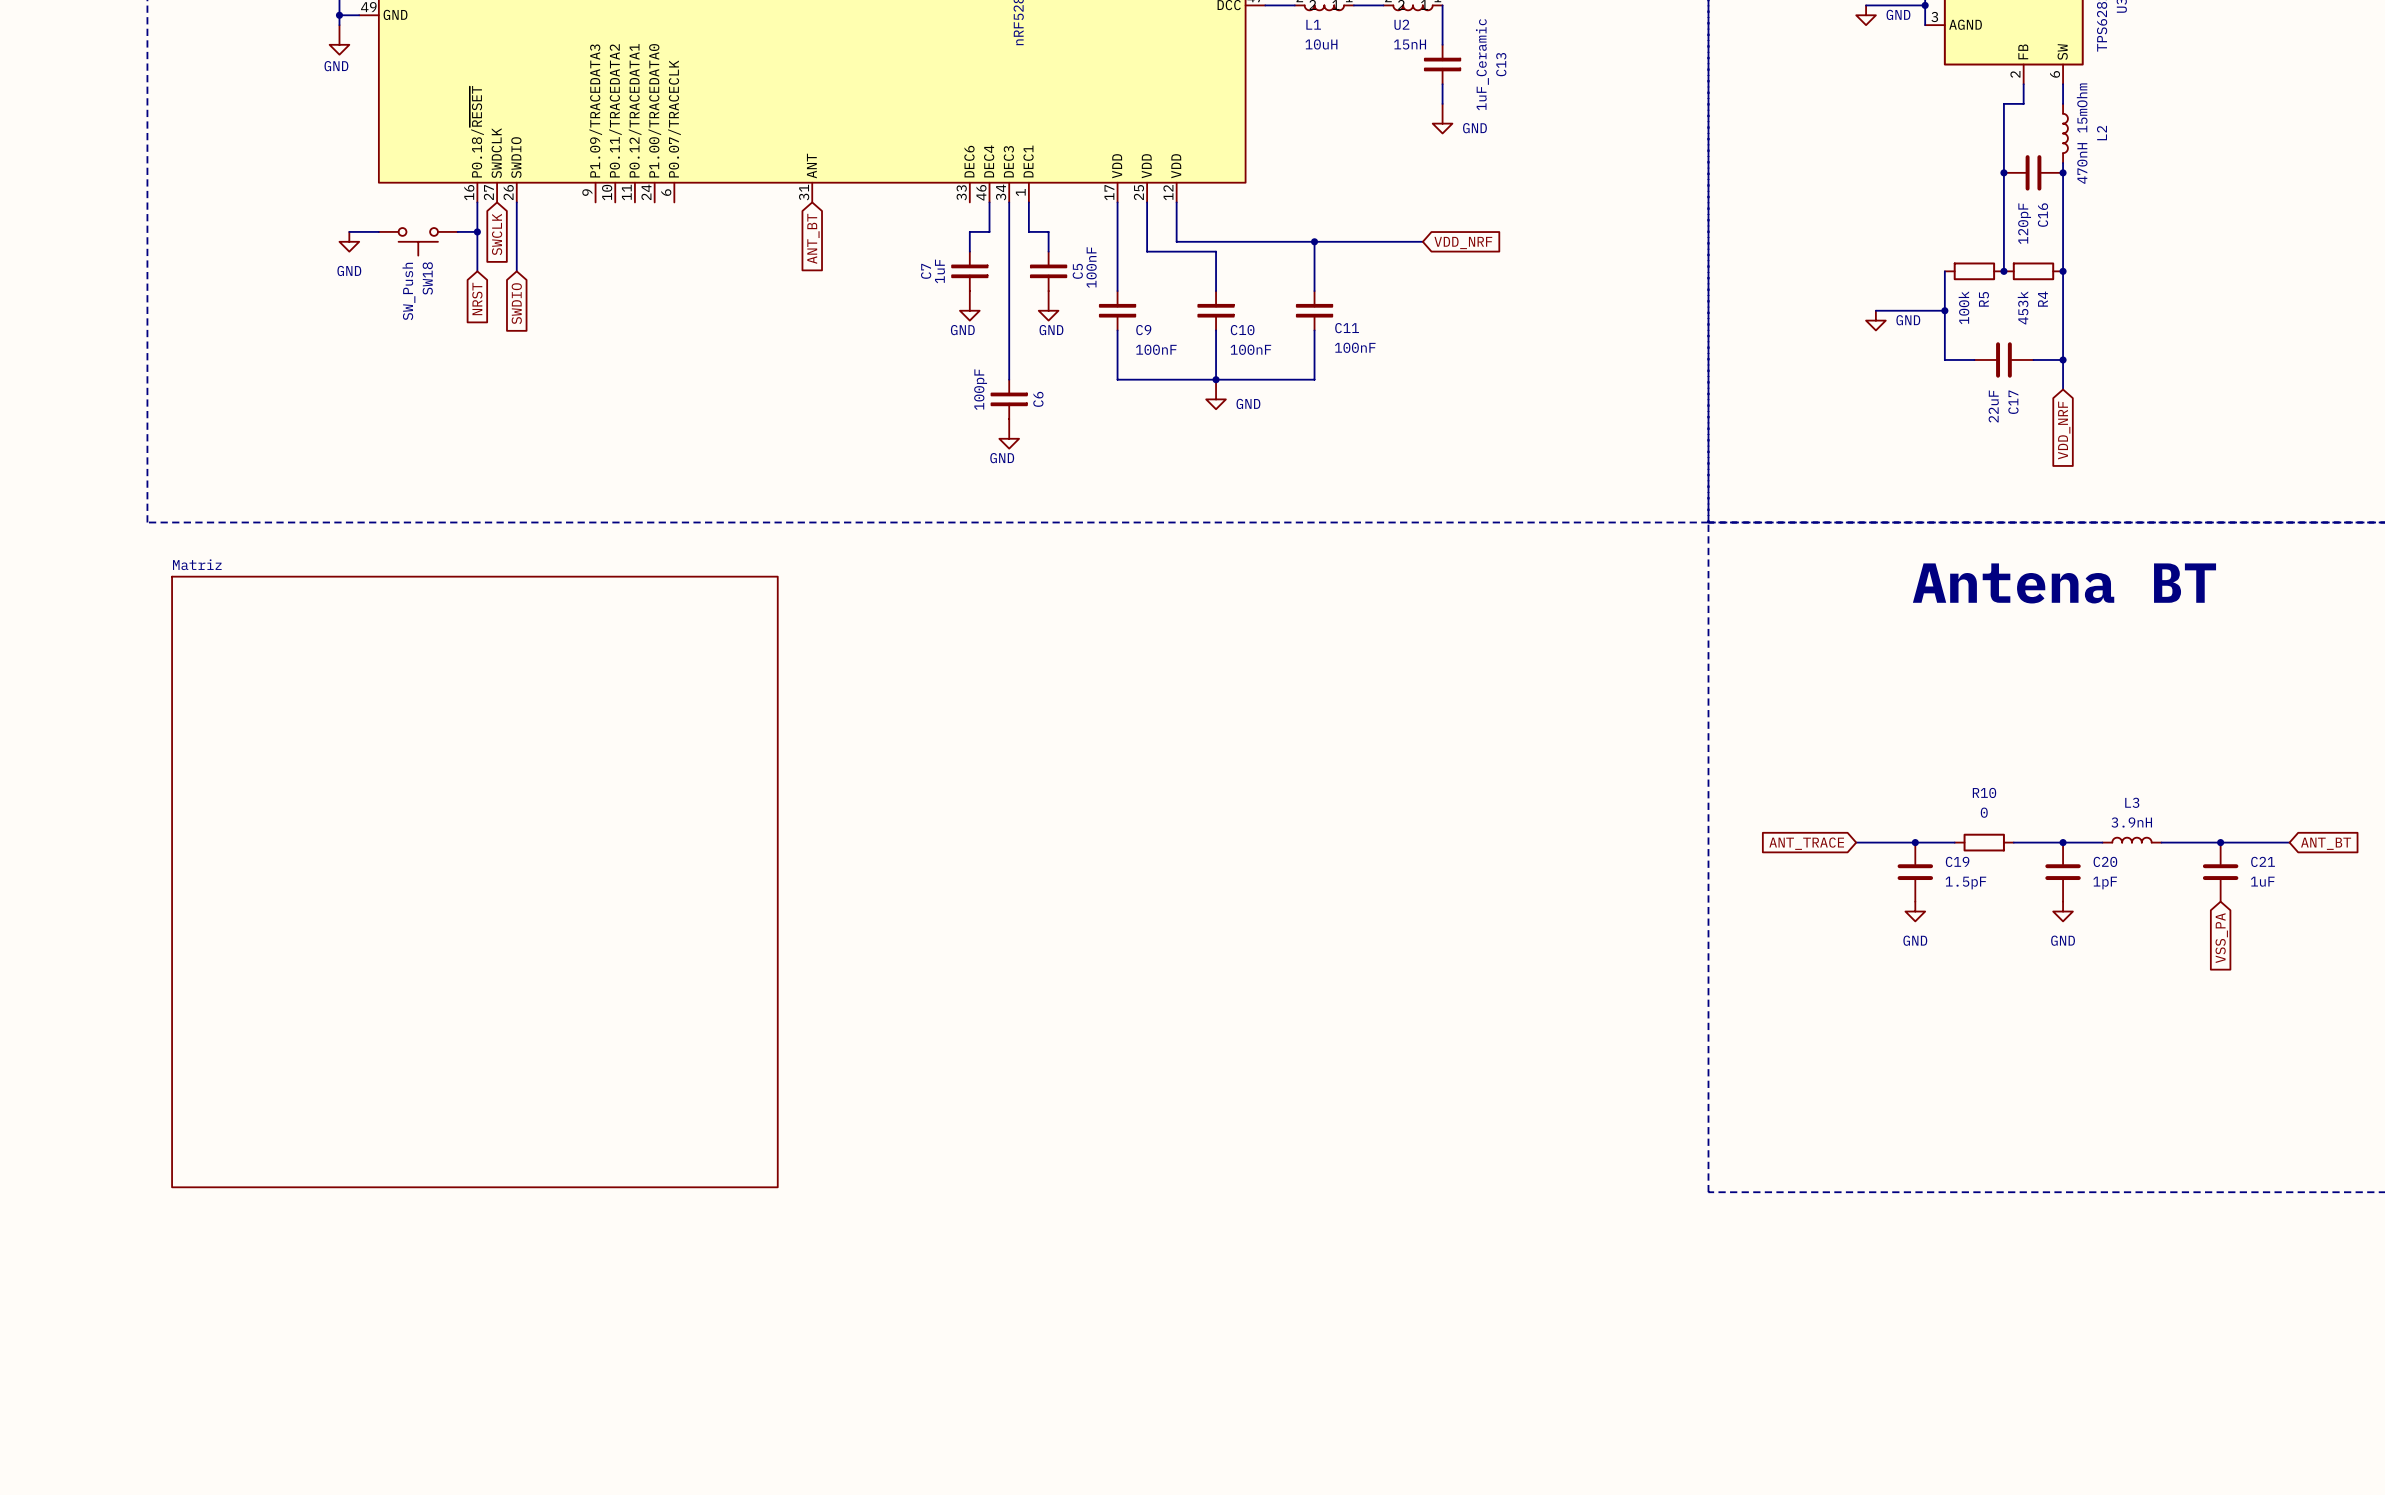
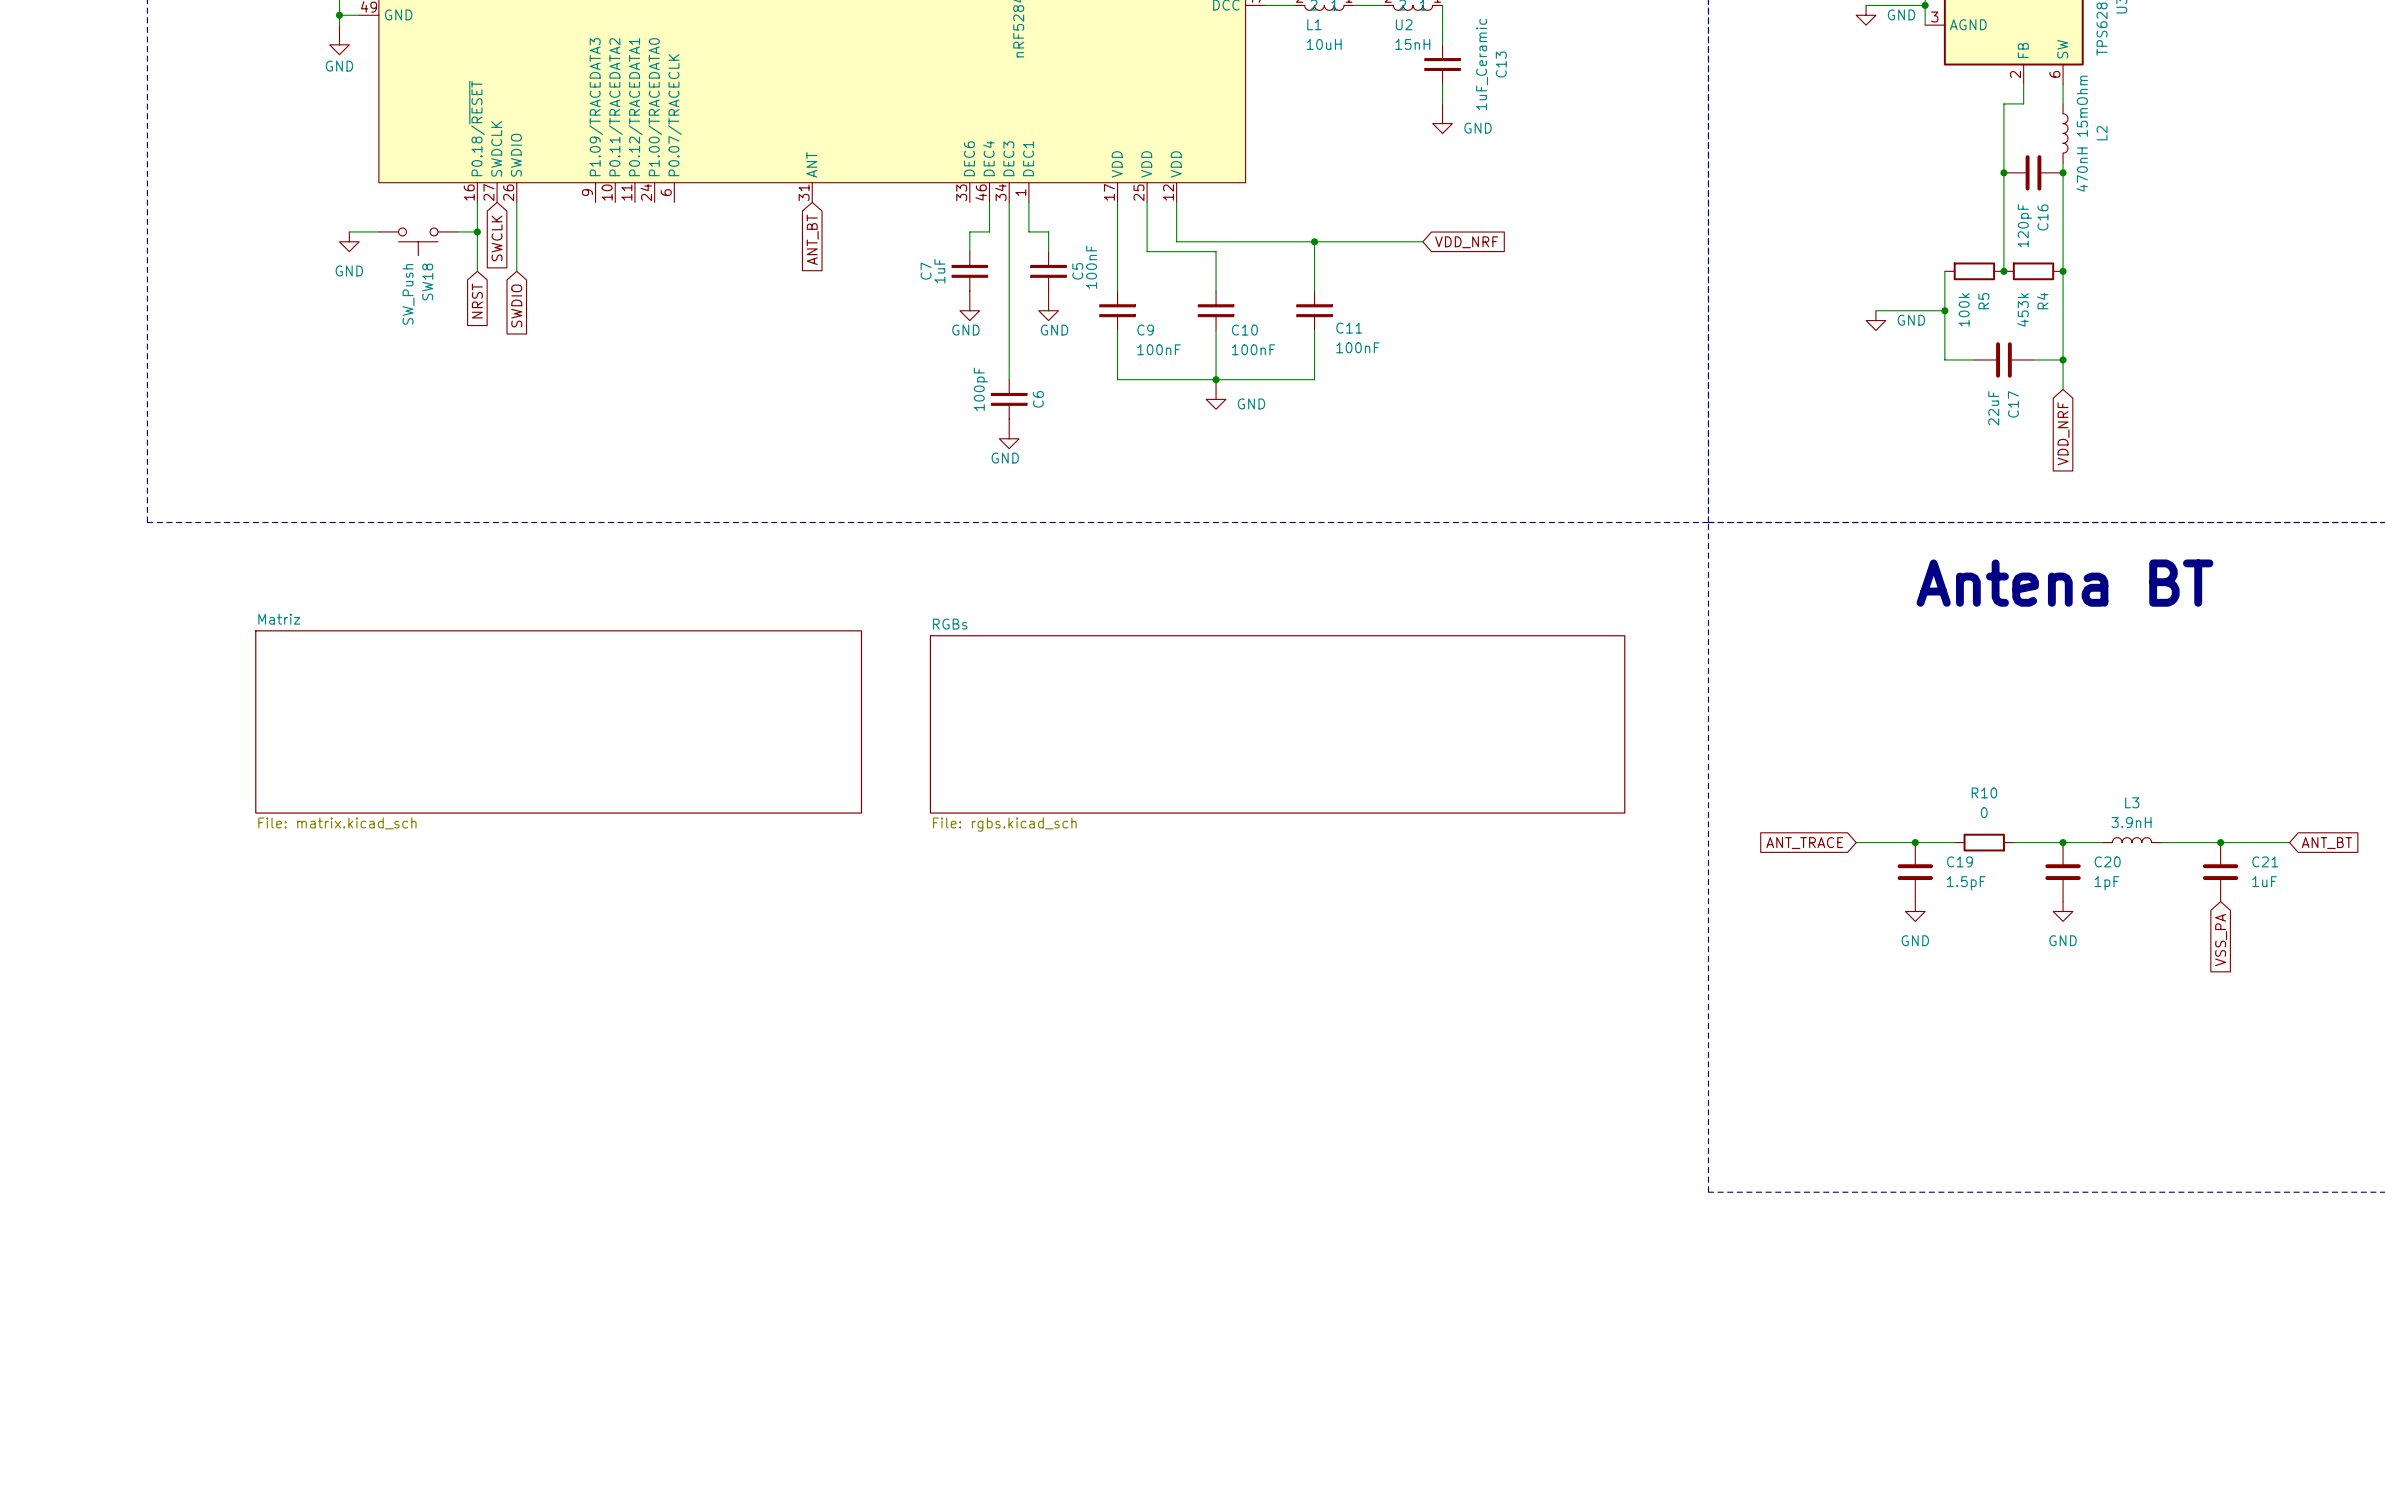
sheet Matriz: none -> File: matrix.kicad_sch (558, 721)
sheet RGBs: none -> File: rgbs.kicad_sch (1277, 724)
sheet Matriz: (474, 881) -> none

